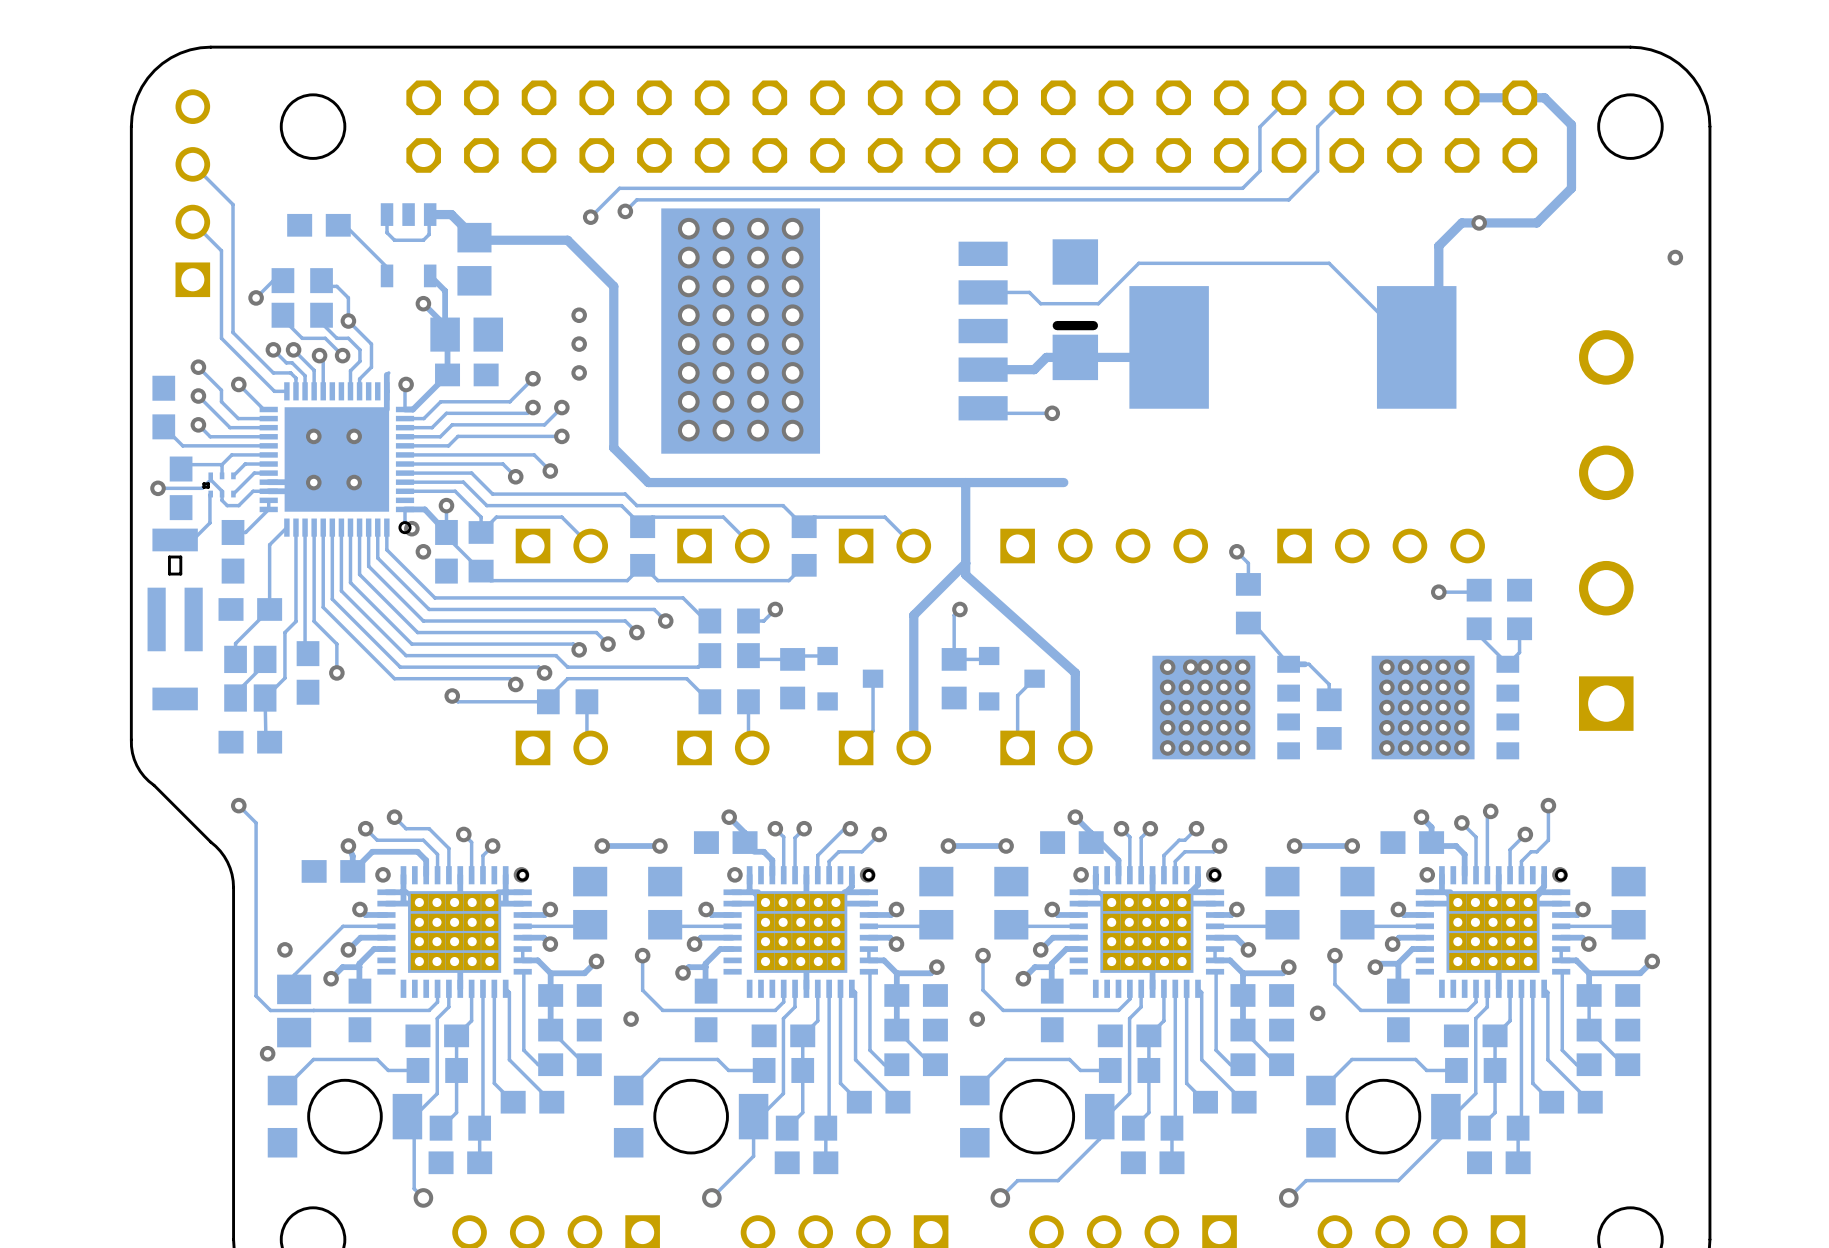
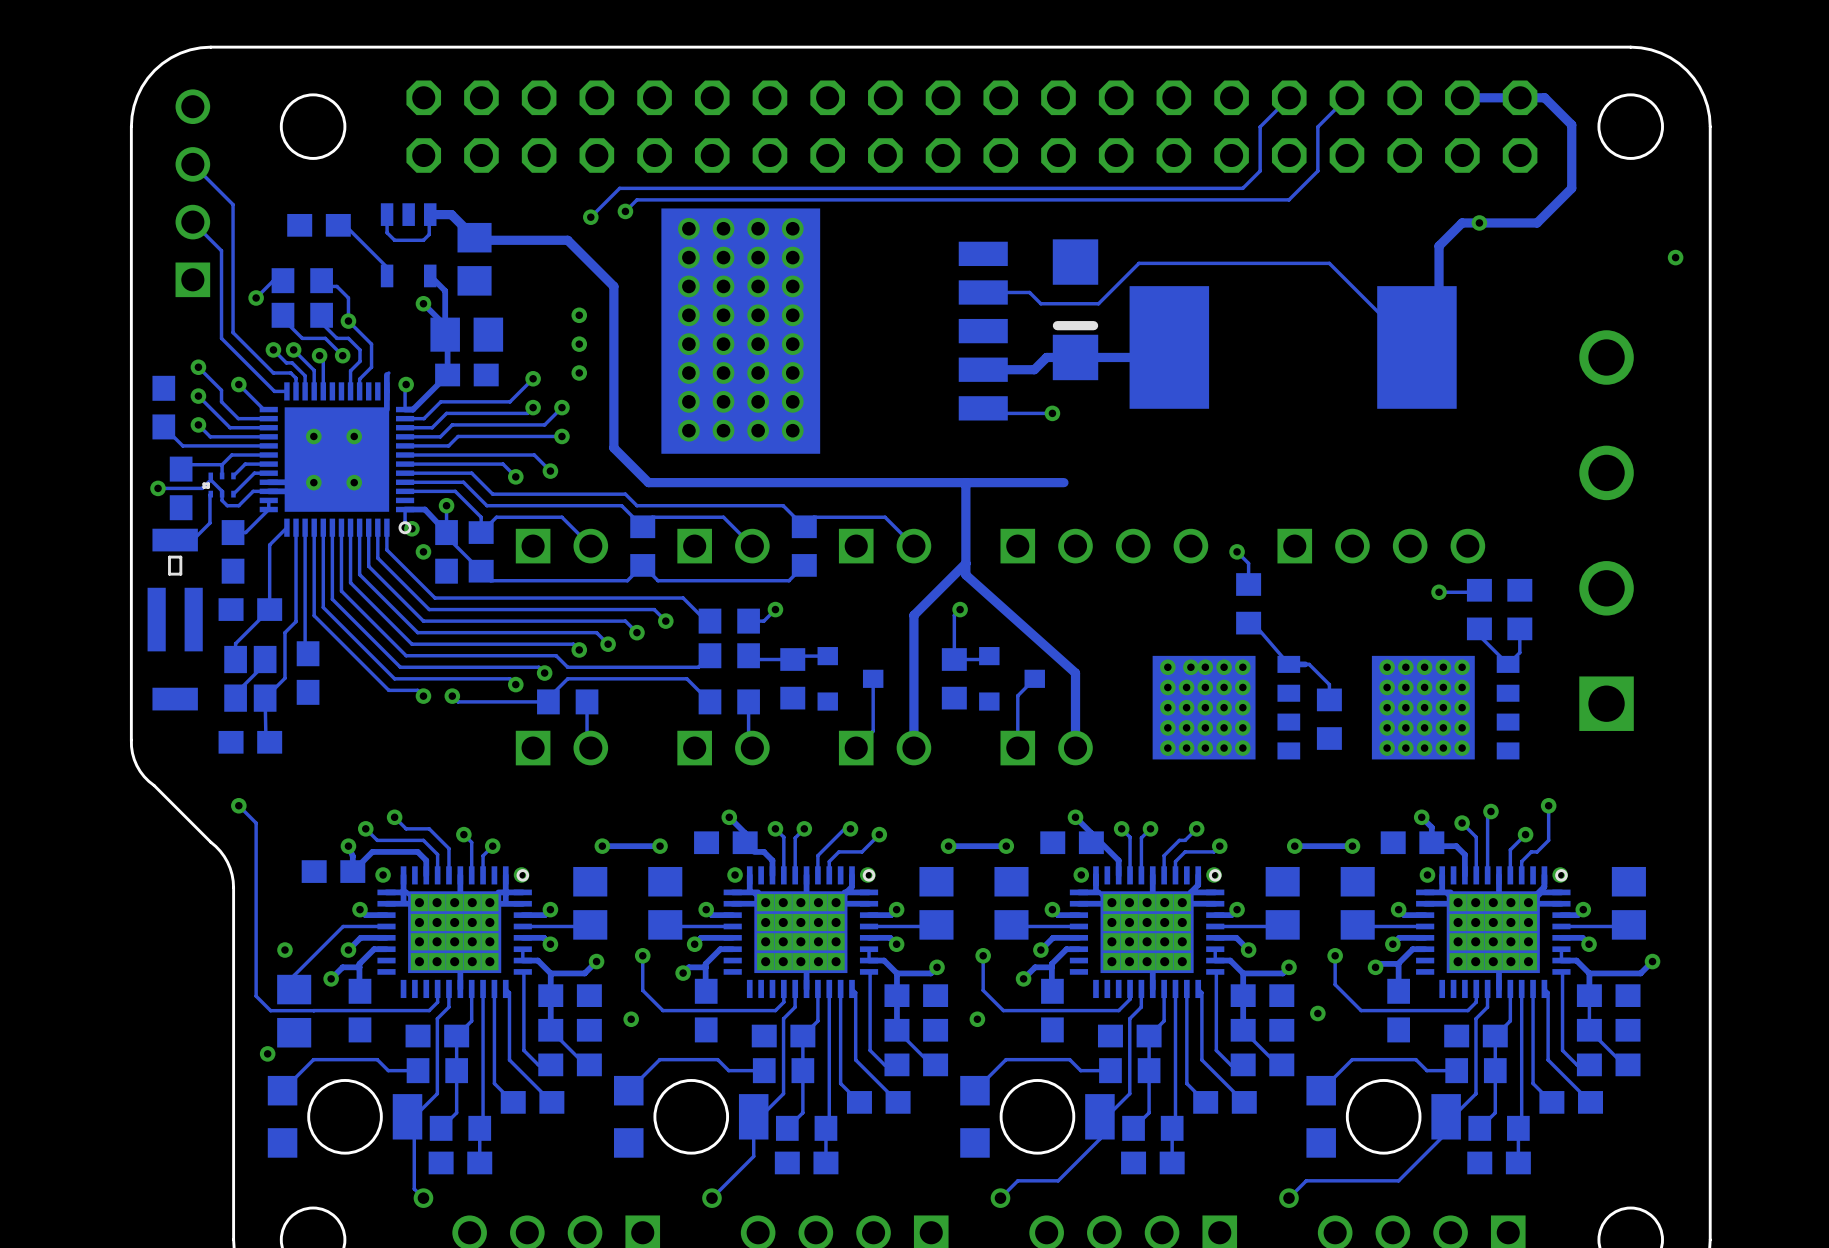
track: (314, 615) (314, 621) (336, 644) (336, 672) -> (314, 615) (388, 690) (417, 690) (423, 696)
via position: (336, 672) -> (423, 696)

